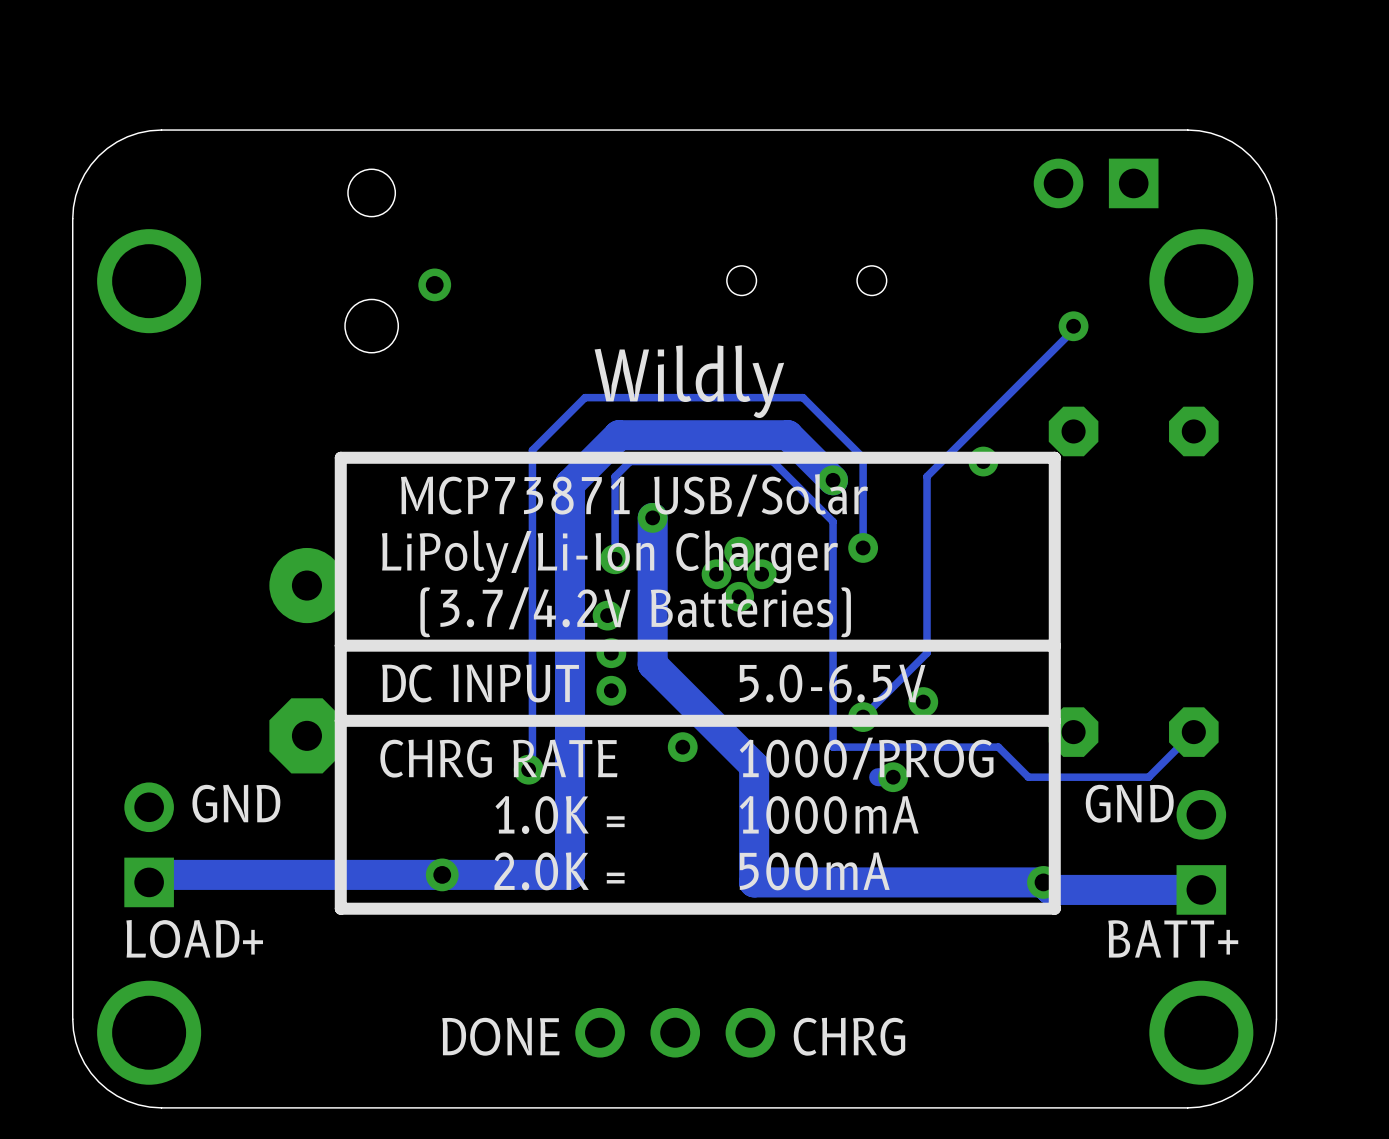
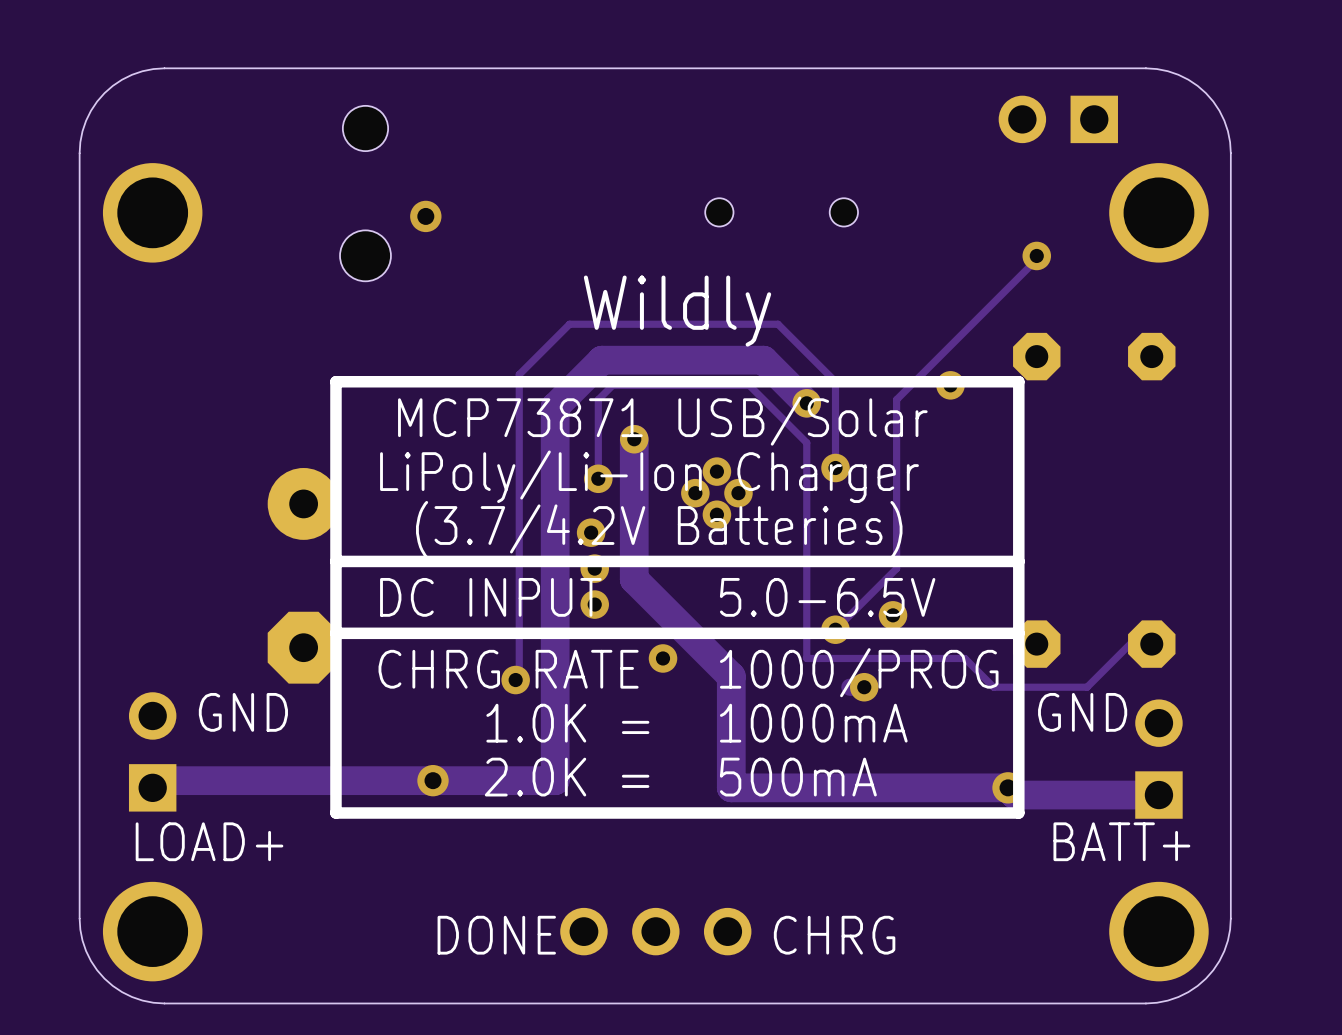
track: (1193, 732) (1148, 777) (1126, 777) -> (1137, 636) (1087, 687)

